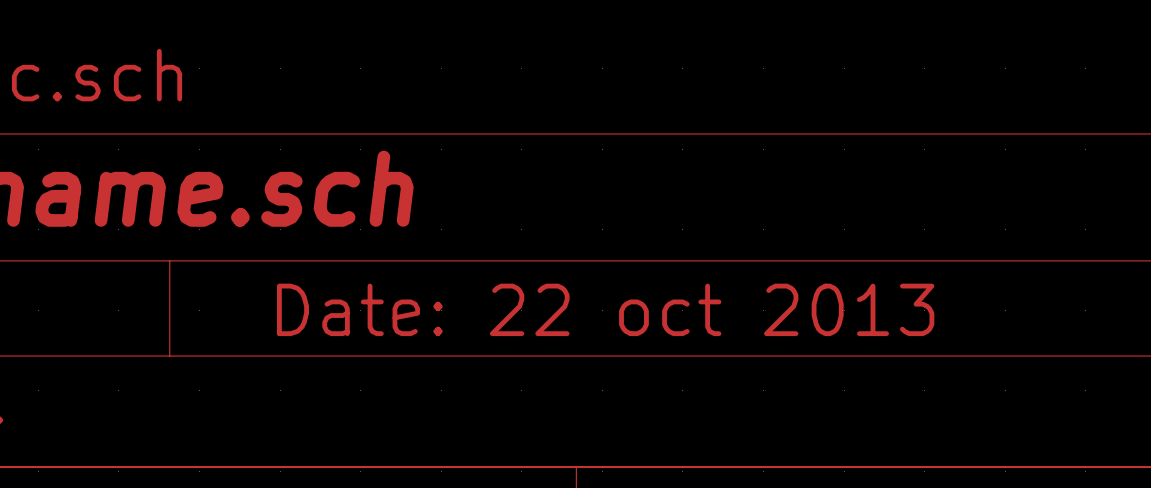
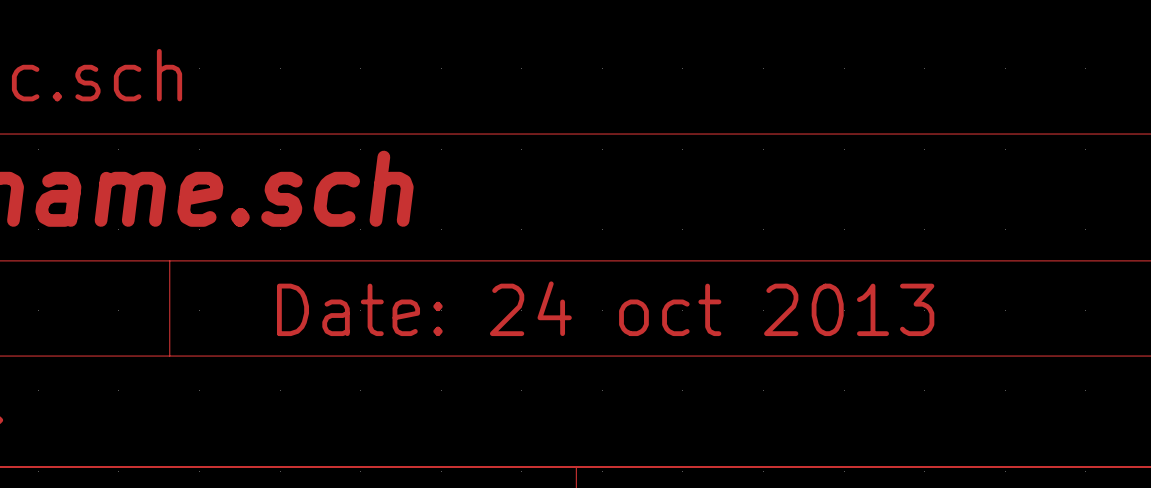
title block: Date: 22 oct 2013 (605, 309) -> Date: 24 oct 2013 (605, 308)

